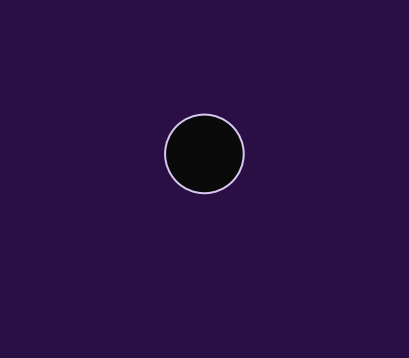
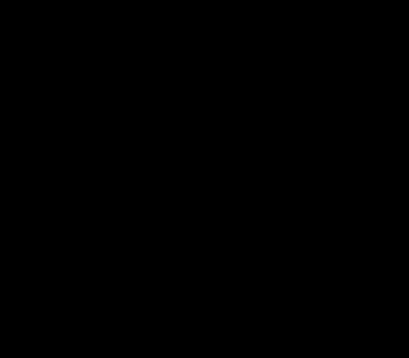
part: (204, 153) -> none

